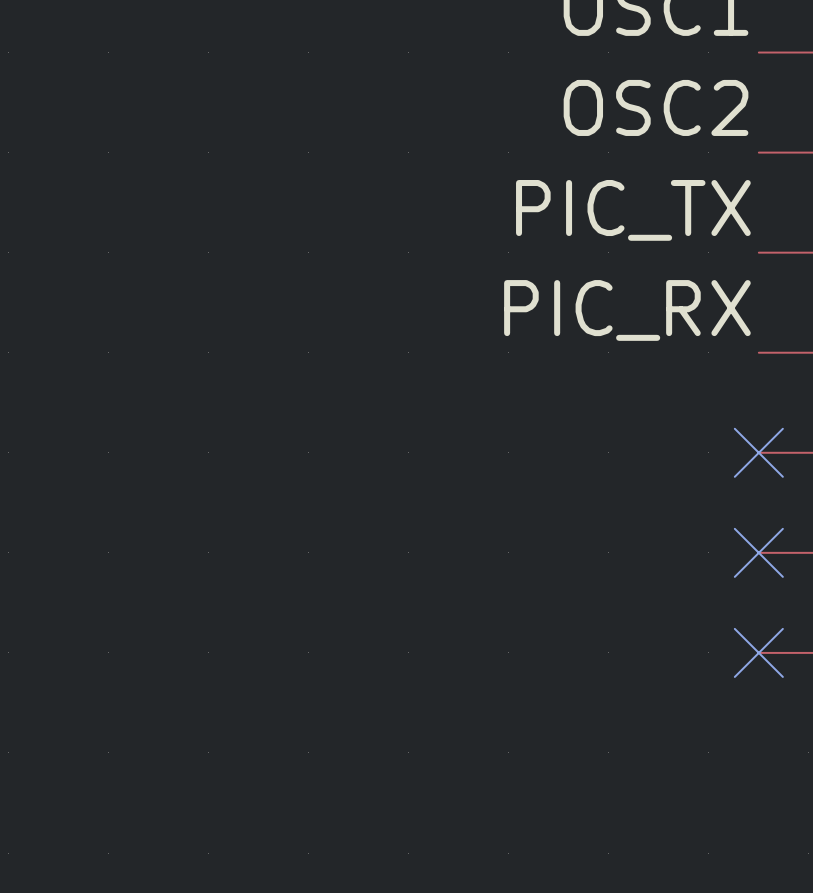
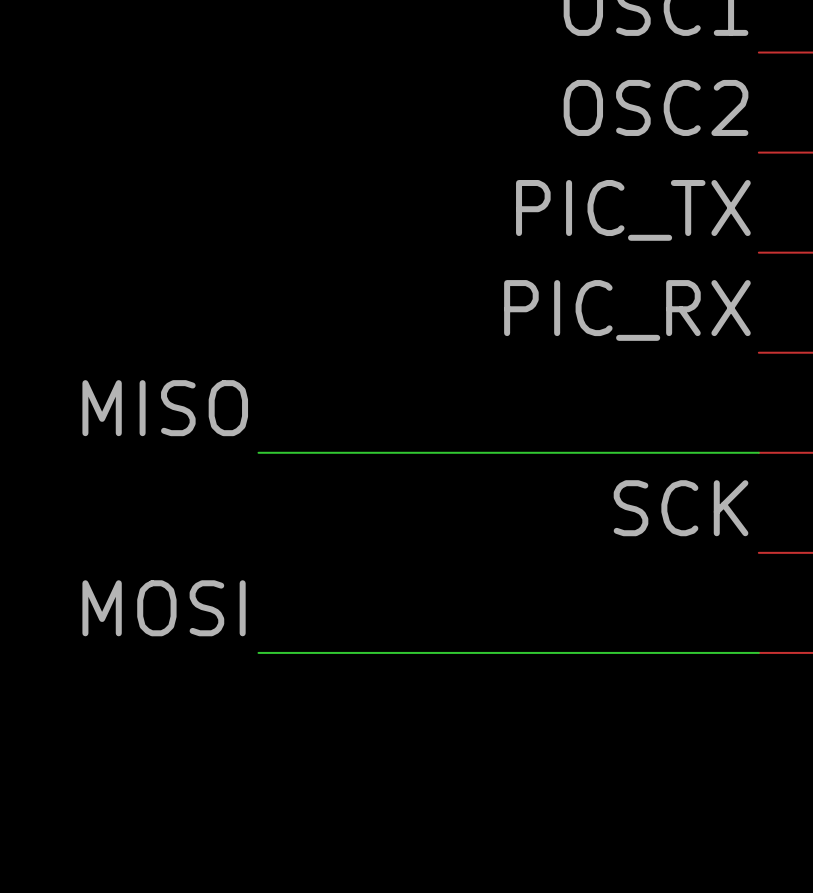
label: none -> MISO (165, 408)
wire: none -> (258, 452) (758, 452)
no-connect mark: (758, 452) -> none
label: none -> SCK (681, 508)
no-connect mark: (758, 552) -> none
label: none -> MOSI (164, 608)
wire: none -> (258, 652) (758, 652)
no-connect mark: (758, 652) -> none

